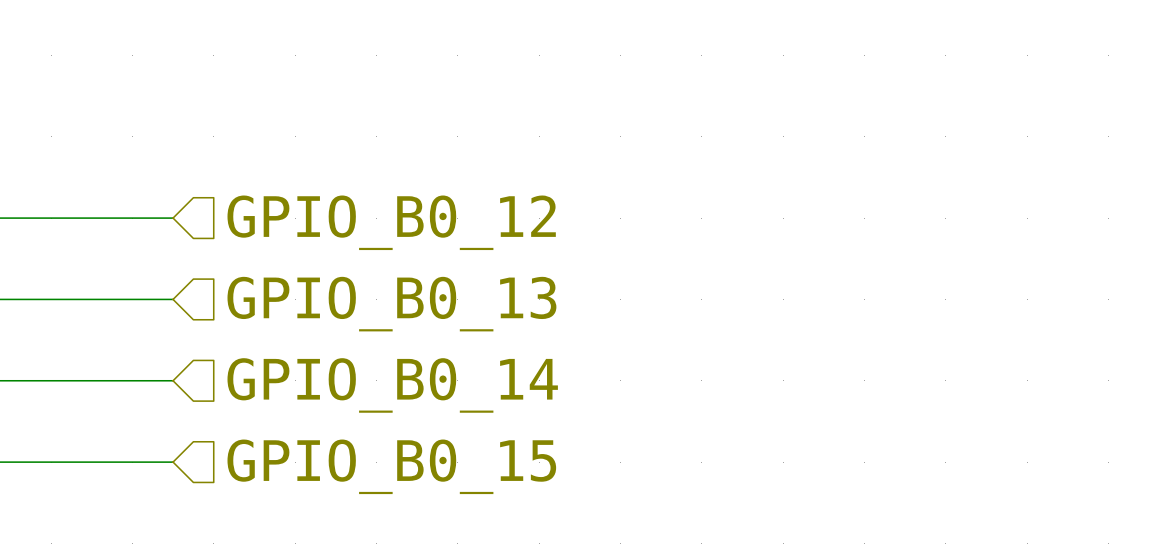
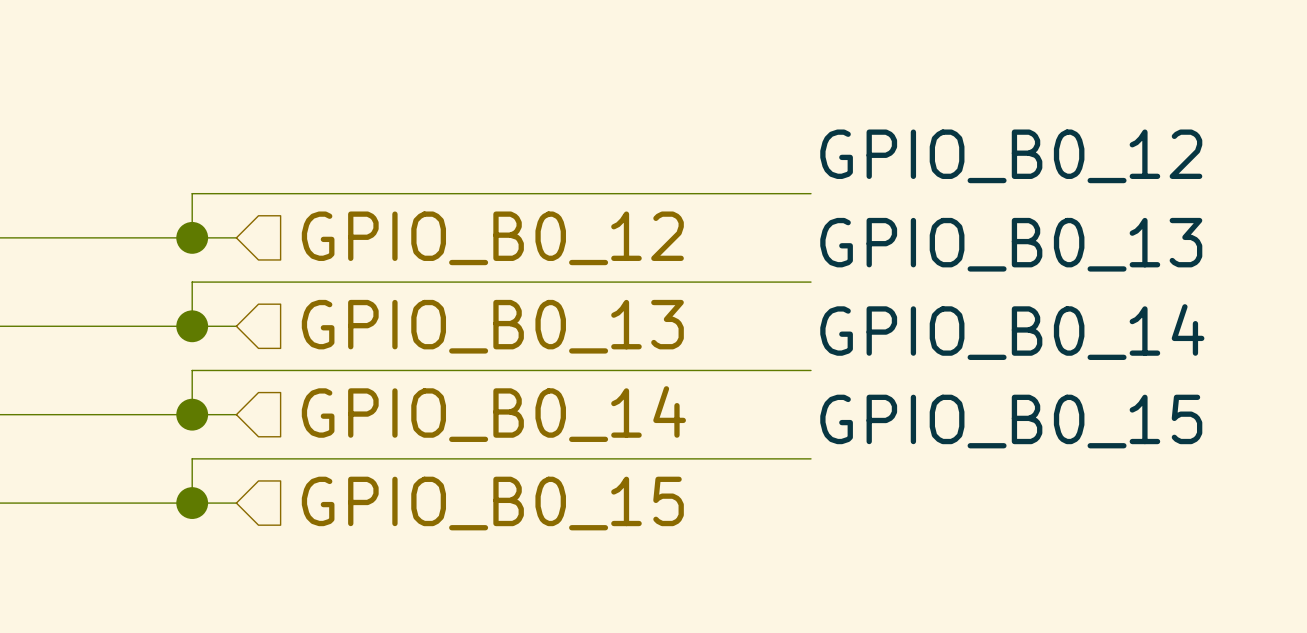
label: none -> GPIO_B0_12 (1011, 156)
wire: none -> (810, 193) (192, 193) (192, 237)
junction: none -> (192, 237)
label: none -> GPIO_B0_13 (1011, 244)
wire: none -> (810, 282) (192, 282) (192, 326)
junction: none -> (192, 326)
label: none -> GPIO_B0_14 (1012, 332)
wire: none -> (810, 370) (192, 370) (192, 414)
junction: none -> (192, 414)
label: none -> GPIO_B0_15 (1011, 421)
wire: none -> (810, 458) (192, 458) (192, 503)
junction: none -> (192, 503)

